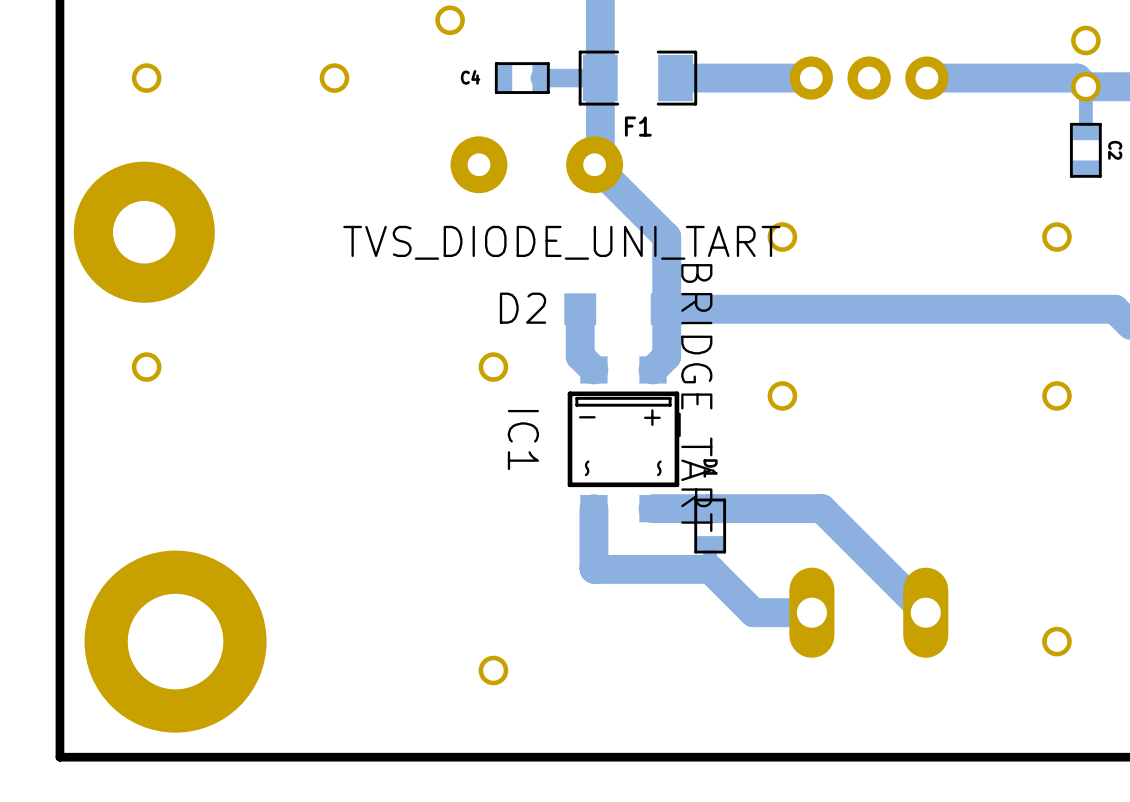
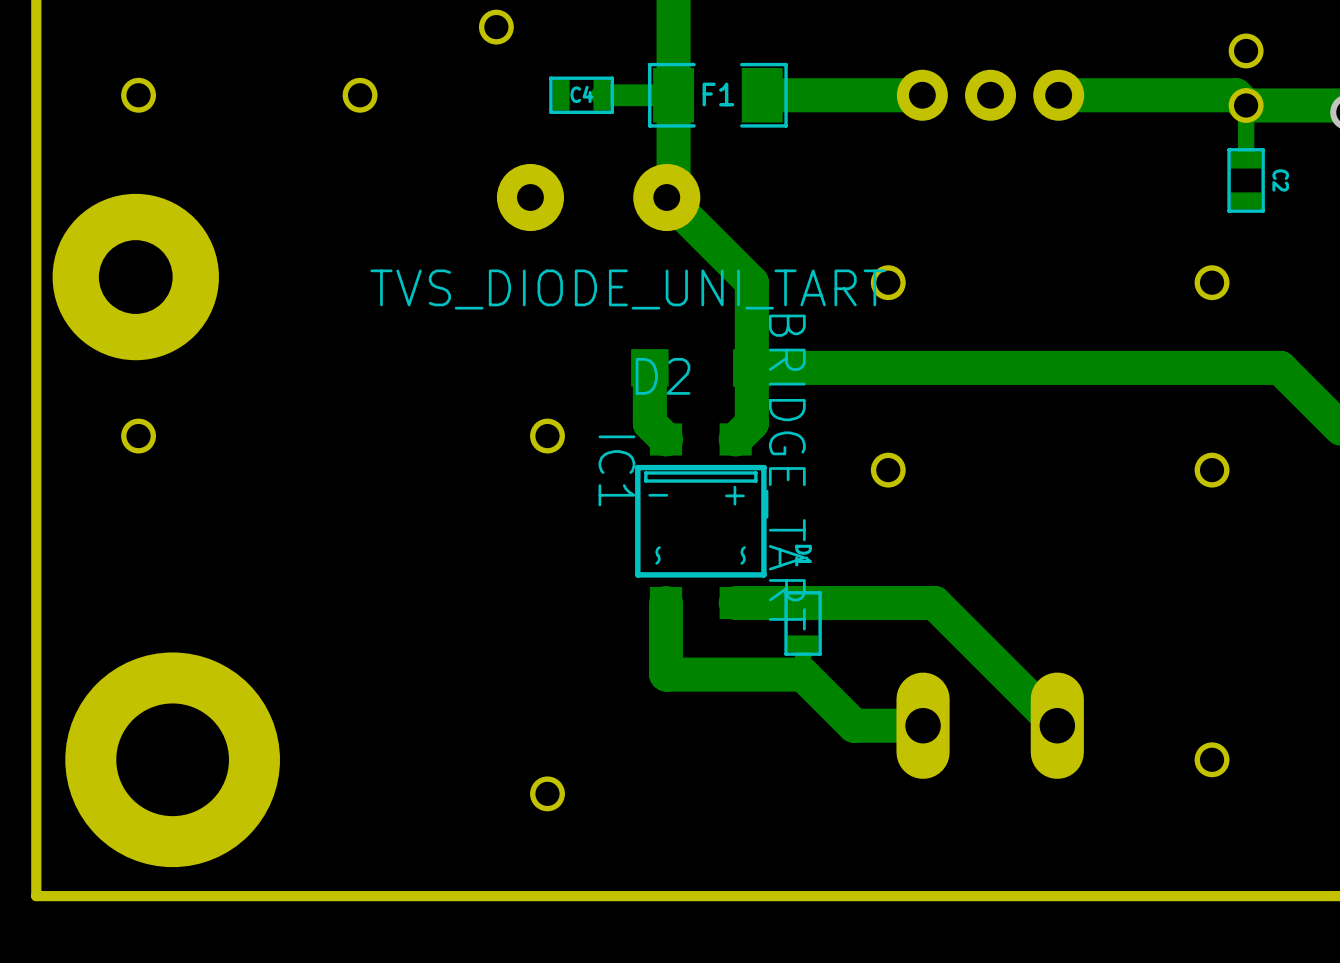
C4 name position: C4 (470, 77) -> C4 (581, 94)
F1 name position: F1 (638, 126) -> F1 (718, 94)
D2 name position: D2 (523, 308) -> D2 (663, 376)
IC1 name position: IC1 (523, 440) -> IC1 (616, 470)

